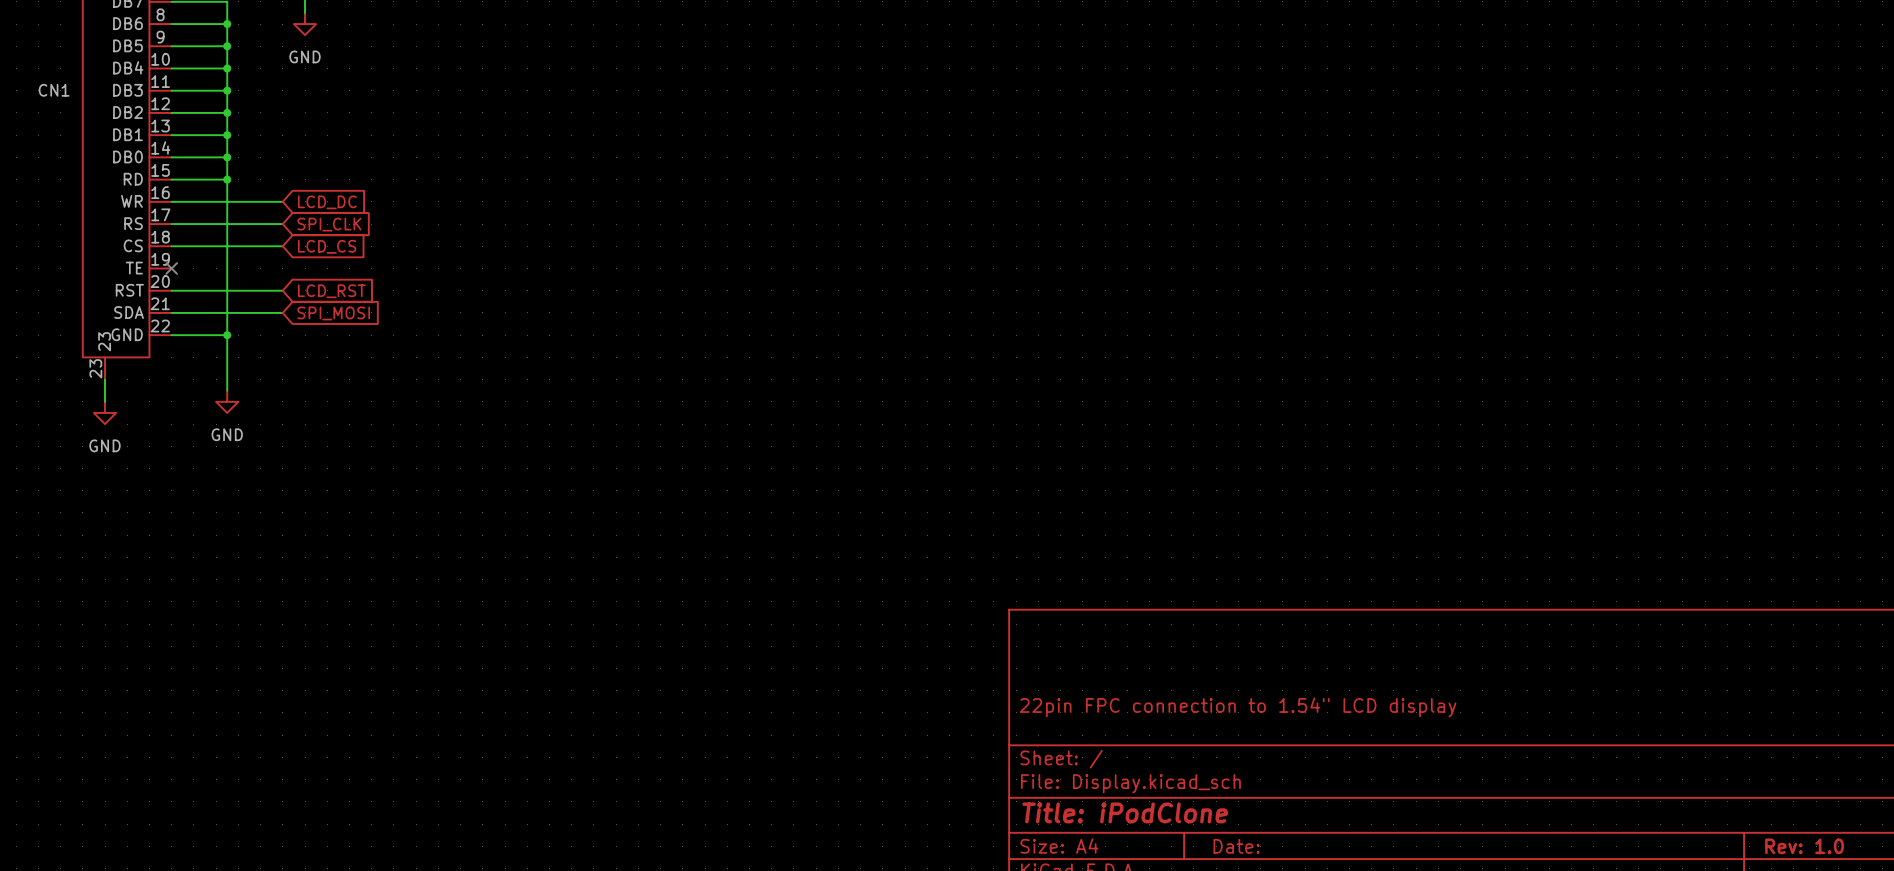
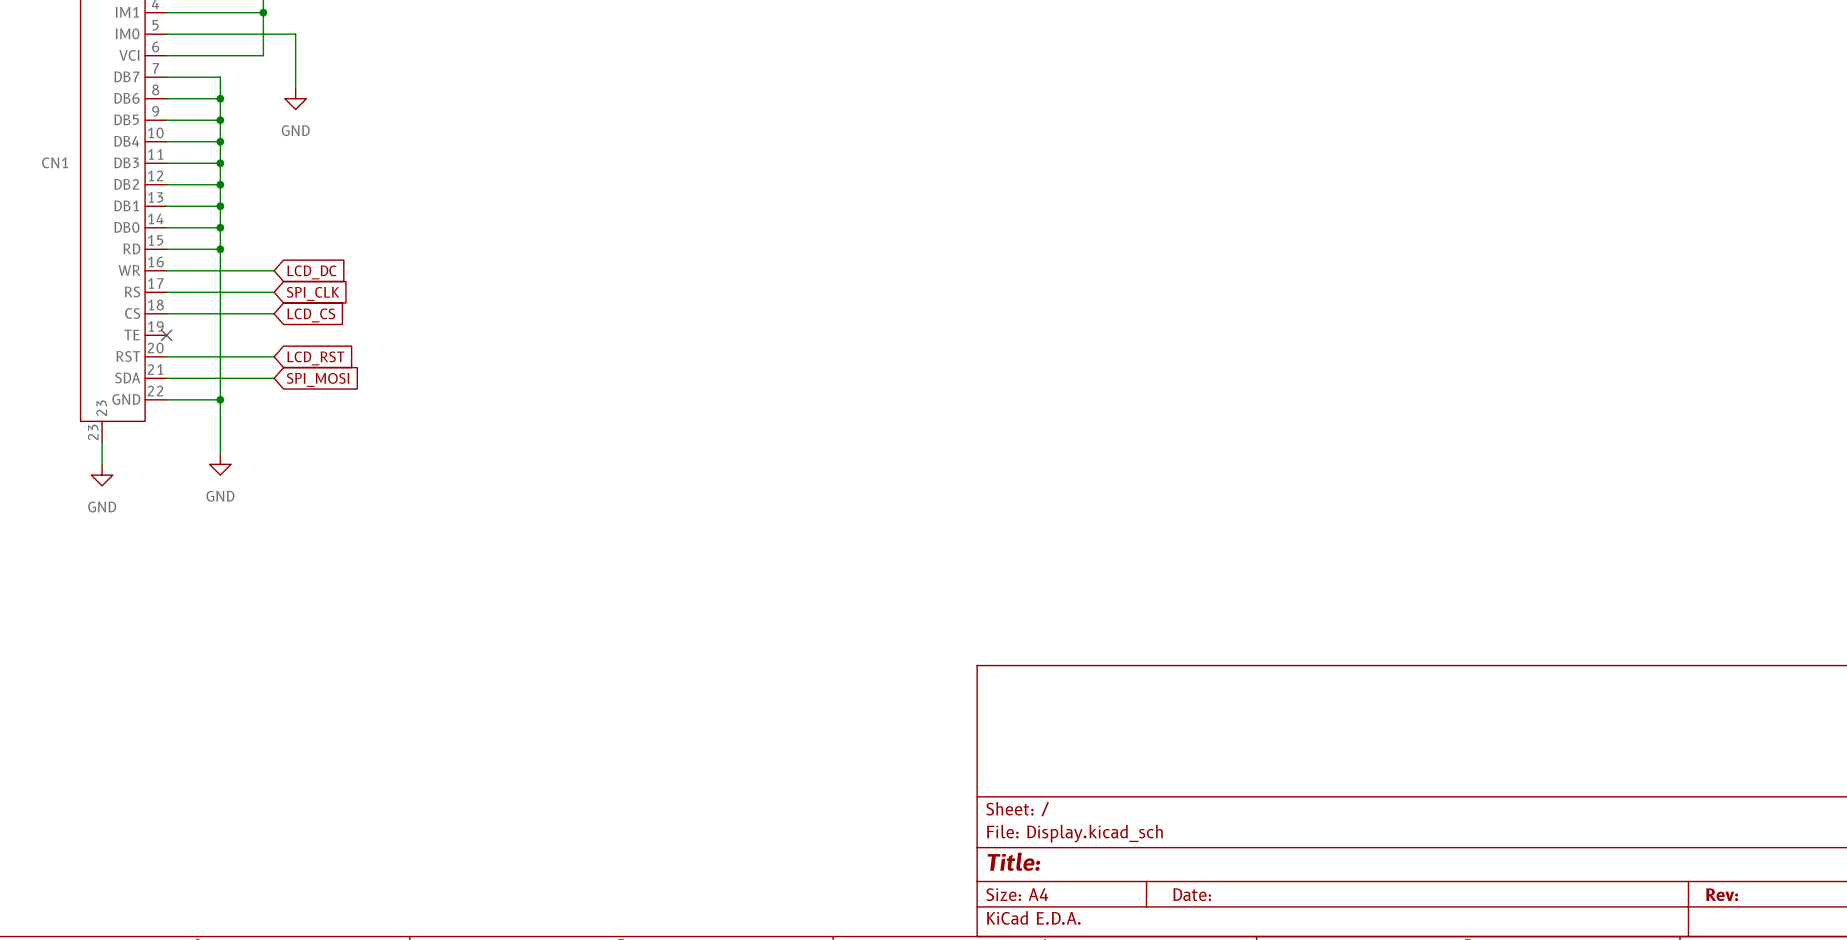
title block: 22pin FPC connection to 1.54" LCD display (1238, 707) -> none
title block: Title: iPodClone (1125, 812) -> Title: (1013, 861)
title block: Rev: 1.0 (1804, 846) -> Rev: (1722, 894)

